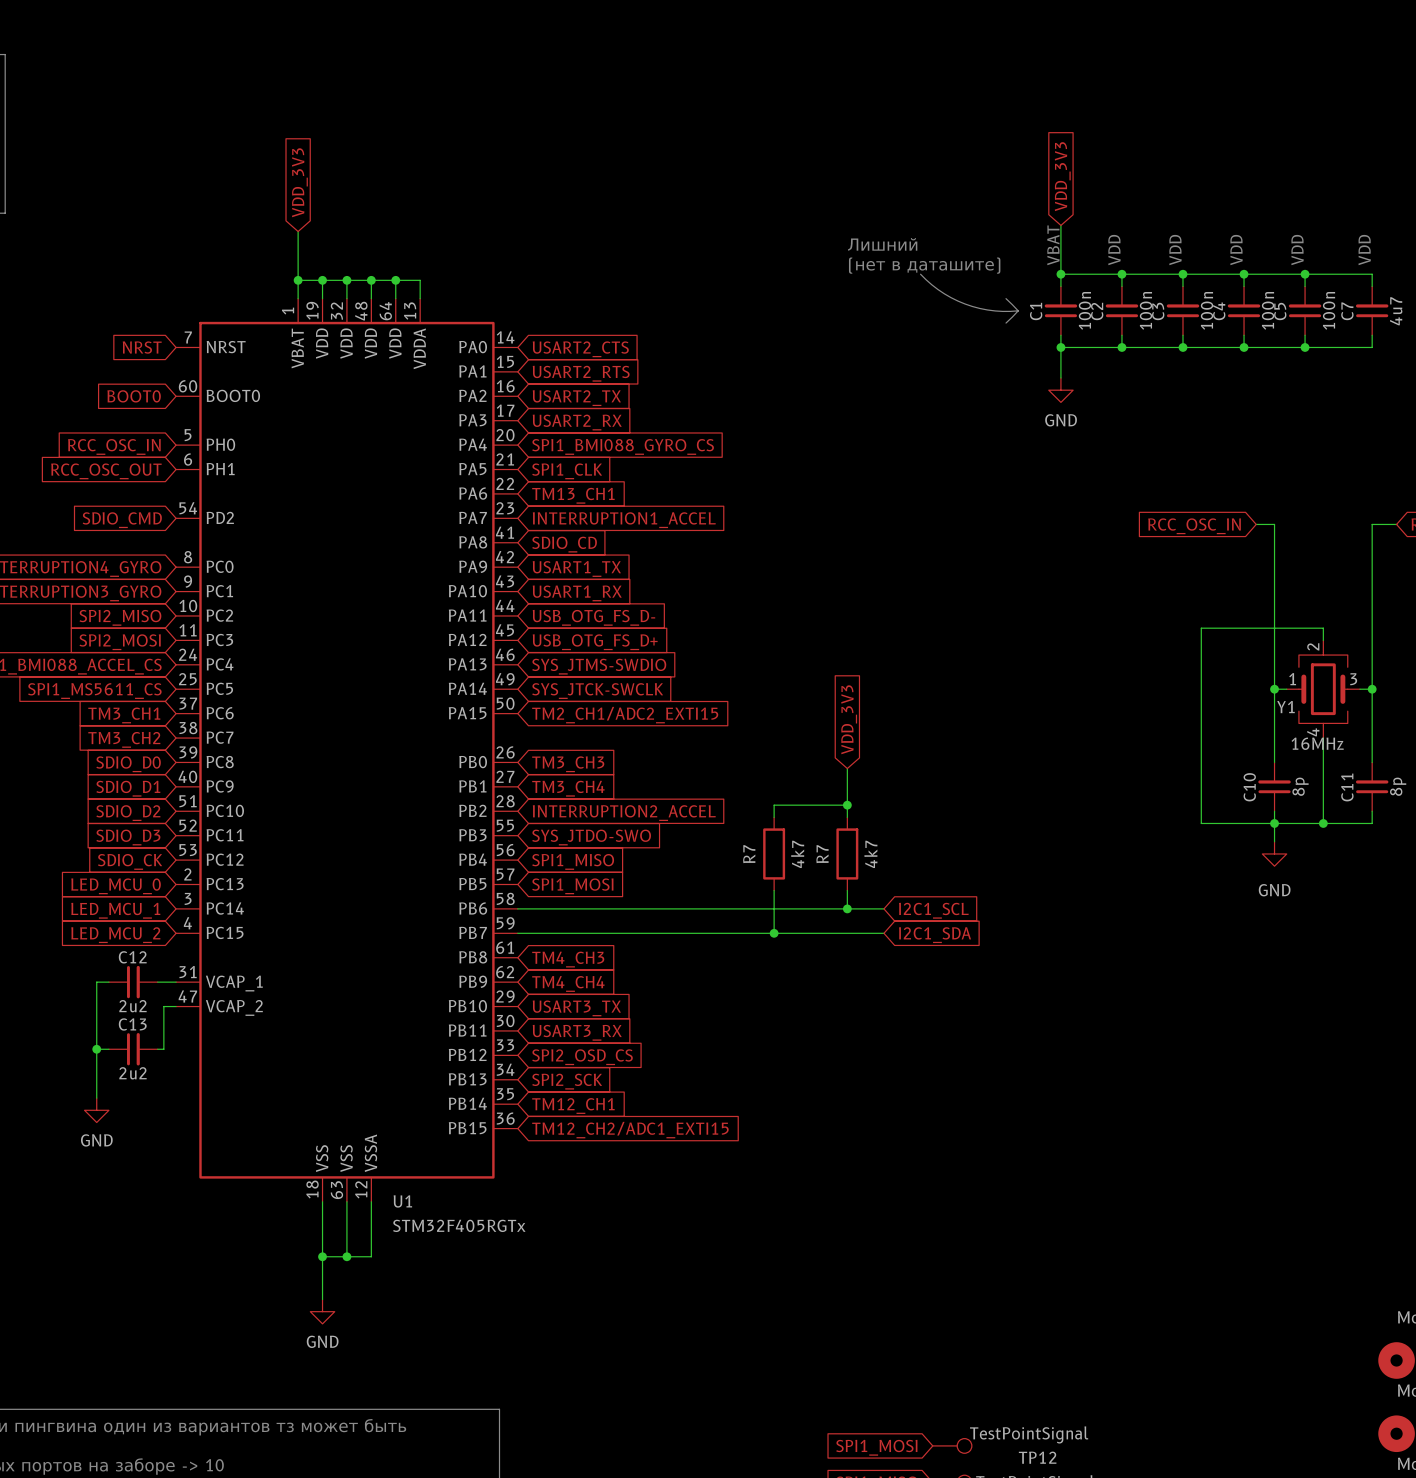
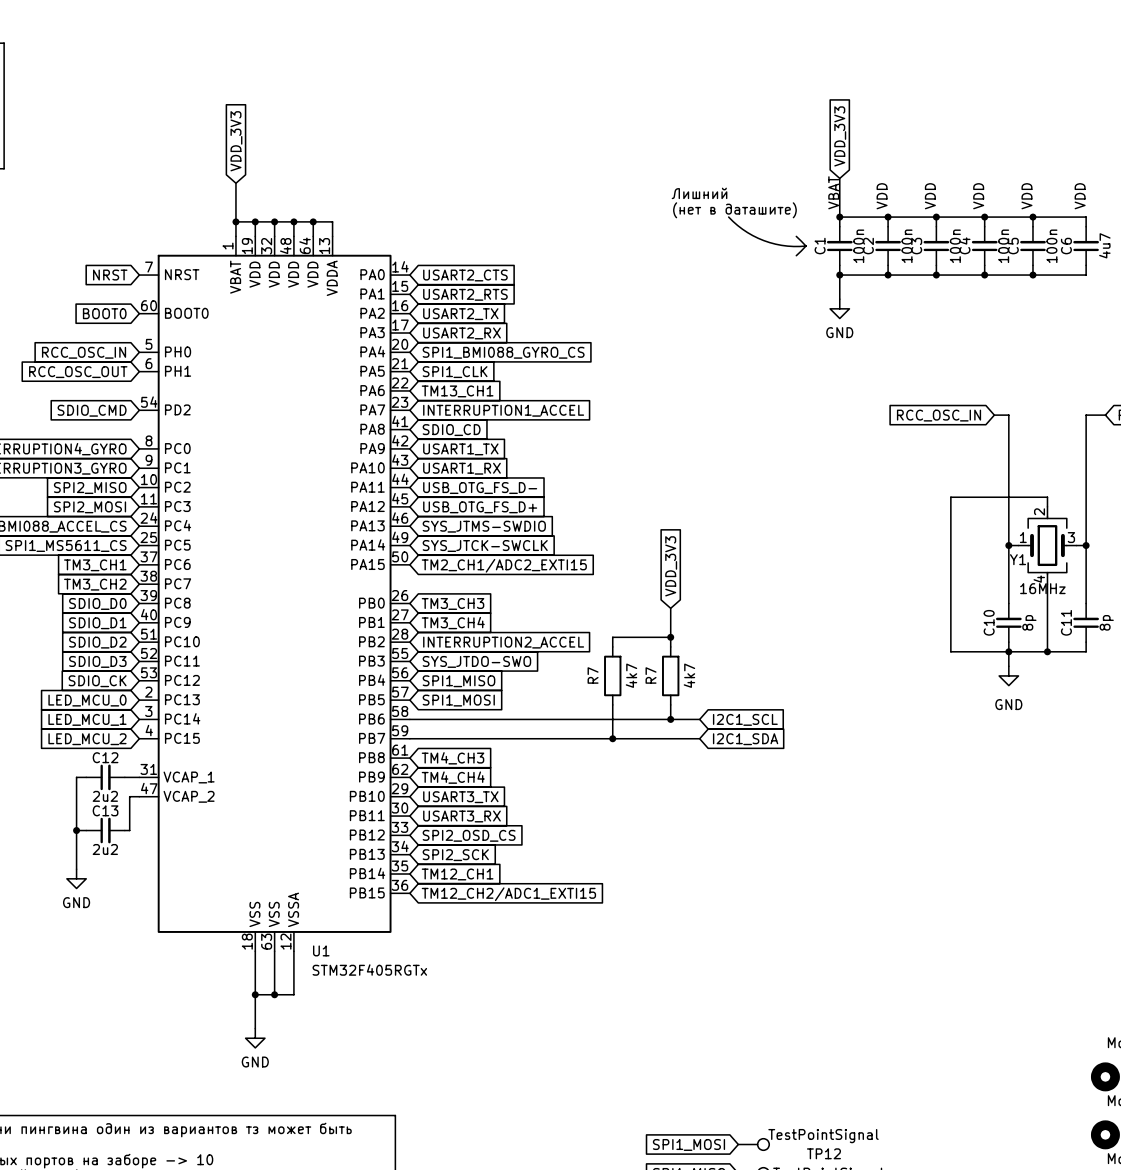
C7 name: C7 (1347, 311) -> C6 (1066, 246)

